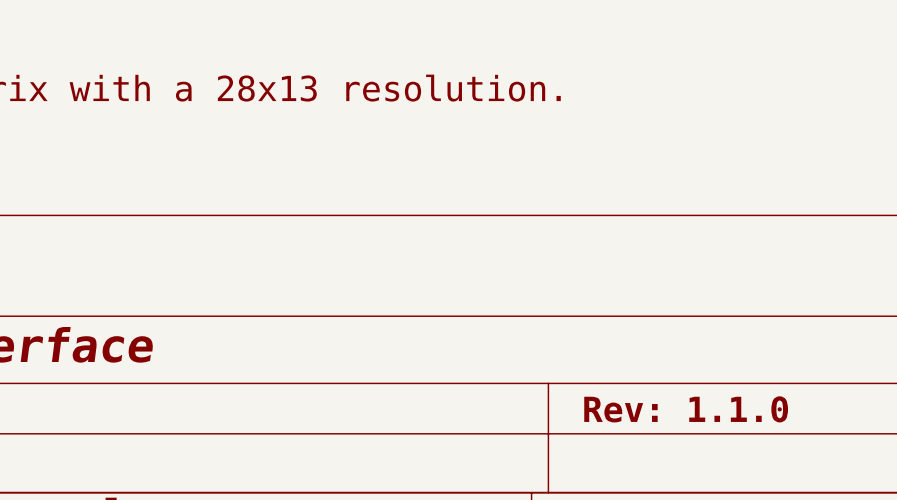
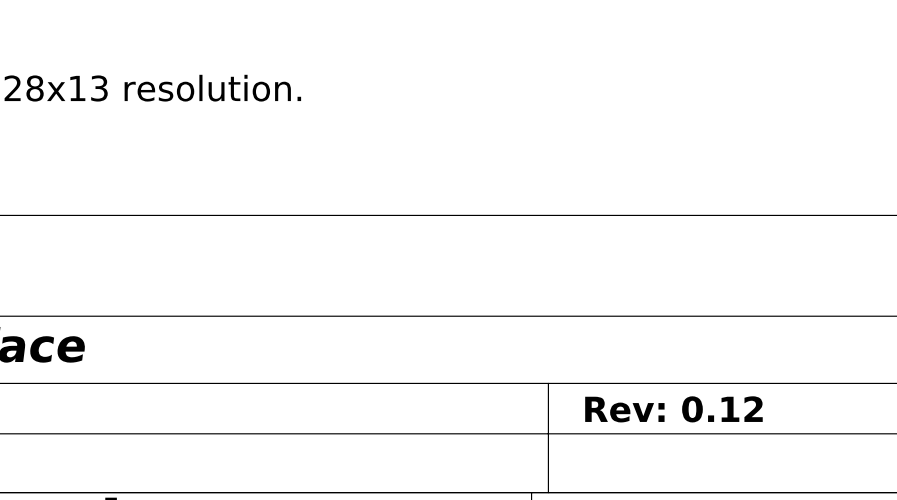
title block: Rev: 1.1.0 (686, 409) -> Rev: 0.12 (673, 409)

